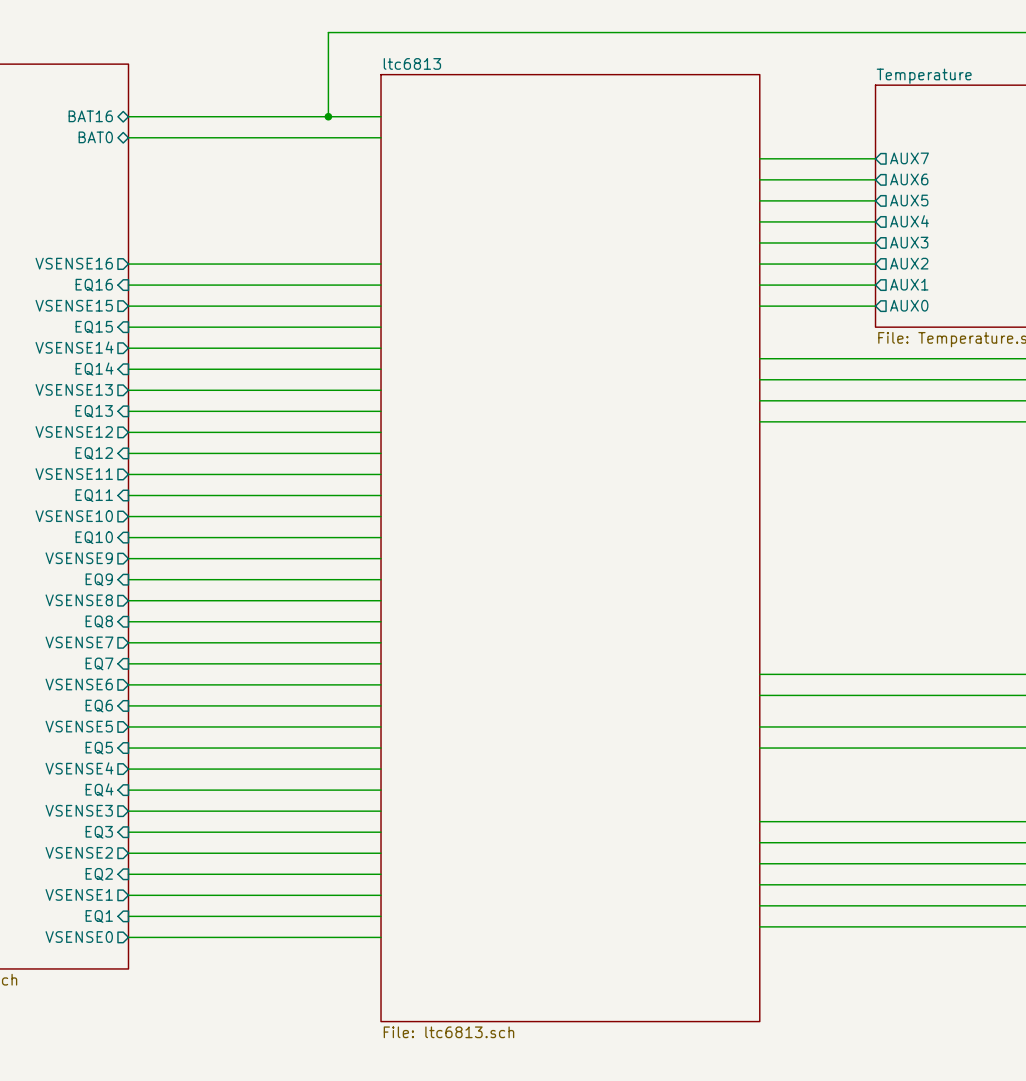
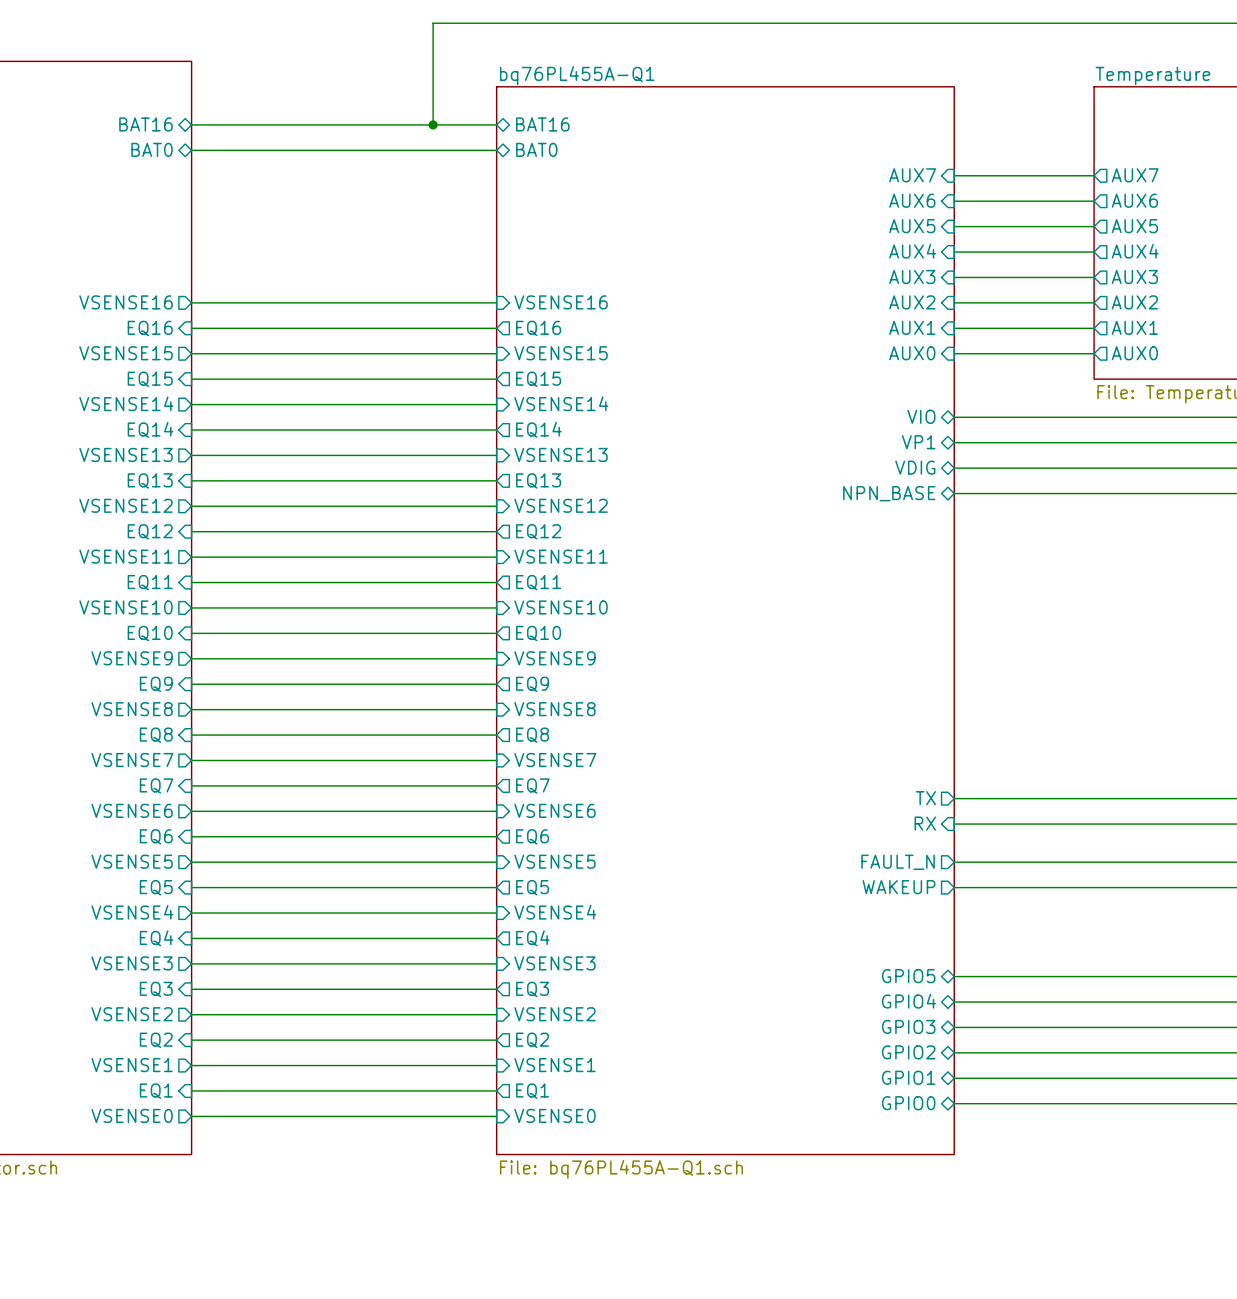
sheet pin: none -> BAT16 (542, 124)
sheet pin: none -> BAT0 (536, 149)
sheet pin: none -> AUX7 (912, 175)
sheet pin: none -> AUX6 (912, 200)
sheet pin: none -> AUX5 (912, 226)
sheet pin: none -> AUX4 (912, 251)
sheet pin: none -> AUX3 (912, 276)
sheet pin: none -> VSENSE16 (561, 302)
sheet pin: none -> AUX2 (912, 302)
sheet pin: none -> AUX1 (912, 327)
sheet pin: none -> EQ16 (538, 328)
sheet pin: none -> VSENSE15 (561, 353)
sheet pin: none -> AUX0 (912, 353)
sheet pin: none -> EQ15 (538, 379)
sheet pin: none -> VSENSE14 (561, 403)
sheet pin: none -> VIO (921, 416)
sheet pin: none -> EQ14 (538, 429)
sheet pin: none -> VP1 (918, 442)
sheet pin: none -> VSENSE13 (561, 454)
sheet pin: none -> VDIG (915, 467)
sheet pin: none -> EQ13 (538, 480)
sheet pin: none -> NPN_BASE (889, 493)
sheet pin: none -> VSENSE12 (561, 505)
sheet pin: none -> EQ12 (538, 531)
sheet pin: none -> VSENSE11 (561, 556)
sheet pin: none -> EQ11 (538, 582)
sheet pin: none -> VSENSE10 (561, 607)
sheet bq76PL455A-Q1: none -> File: bq76PL455A-Q1.sch (725, 620)
sheet pin: none -> EQ10 (538, 633)
sheet ltc6813: File: ltc6813.sch (570, 548) -> none
sheet pin: none -> VSENSE9 (554, 658)
sheet pin: none -> EQ9 (532, 684)
sheet pin: none -> VSENSE8 (554, 709)
sheet pin: none -> EQ8 (532, 735)
sheet pin: none -> VSENSE7 (555, 760)
sheet pin: none -> EQ7 (532, 786)
sheet pin: none -> TX (925, 798)
sheet pin: none -> VSENSE6 (554, 810)
sheet pin: none -> RX (925, 823)
sheet pin: none -> EQ6 (532, 836)
sheet pin: none -> VSENSE5 (554, 861)
sheet pin: none -> FAULT_N (898, 862)
sheet pin: none -> WAKEUP (898, 887)
sheet pin: none -> EQ5 (532, 887)
sheet pin: none -> VSENSE4 (555, 912)
sheet pin: none -> EQ4 (532, 938)
sheet pin: none -> VSENSE3 (554, 963)
sheet pin: none -> GPIO5 (908, 976)
sheet pin: none -> EQ3 (532, 989)
sheet pin: none -> GPIO4 (908, 1001)
sheet pin: none -> VSENSE2 (554, 1014)
sheet pin: none -> GPIO3 (908, 1026)
sheet pin: none -> EQ2 (532, 1040)
sheet pin: none -> GPIO2 (908, 1052)
sheet pin: none -> VSENSE1 (554, 1065)
sheet pin: none -> GPIO1 (908, 1077)
sheet pin: none -> EQ1 (532, 1091)
sheet pin: none -> GPIO0 (908, 1103)
sheet pin: none -> VSENSE0 (554, 1115)

